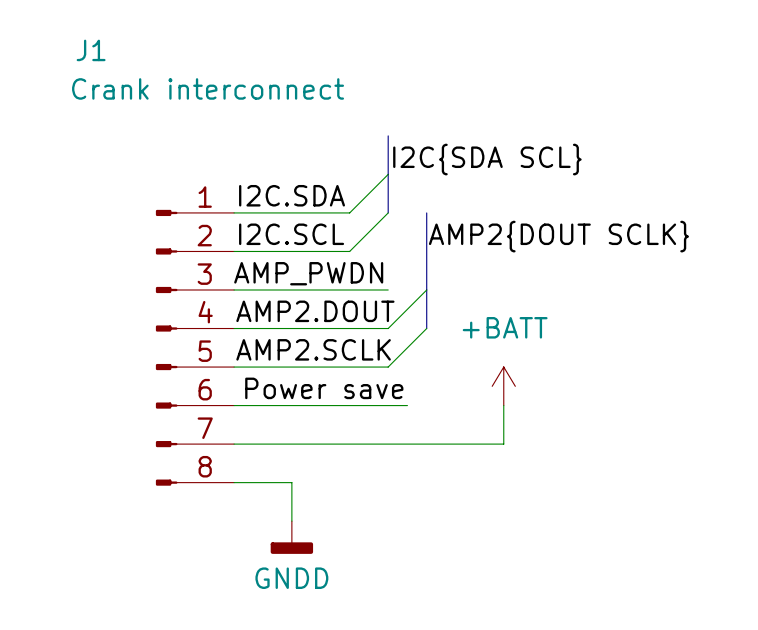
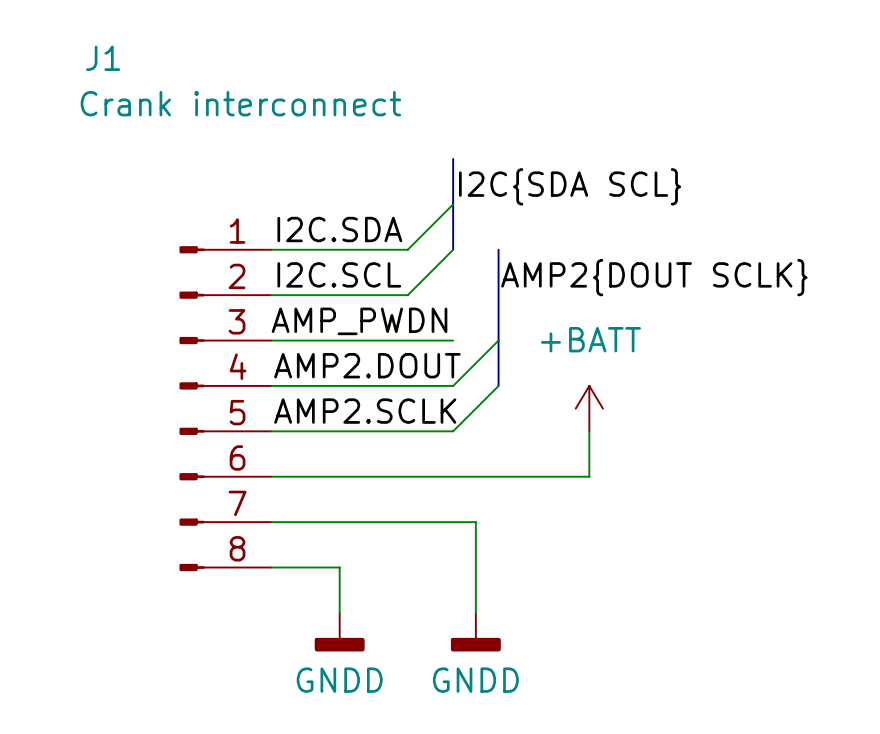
wire: none -> (589, 431) (589, 476) (475, 476)
power symbol position: +BATT (503, 386) -> +BATT (589, 408)
label: Power save (324, 388) -> none
wire: (503, 405) (503, 444) (407, 444) -> (475, 612) (475, 522)
power symbol: none -> GNDD (475, 632)

